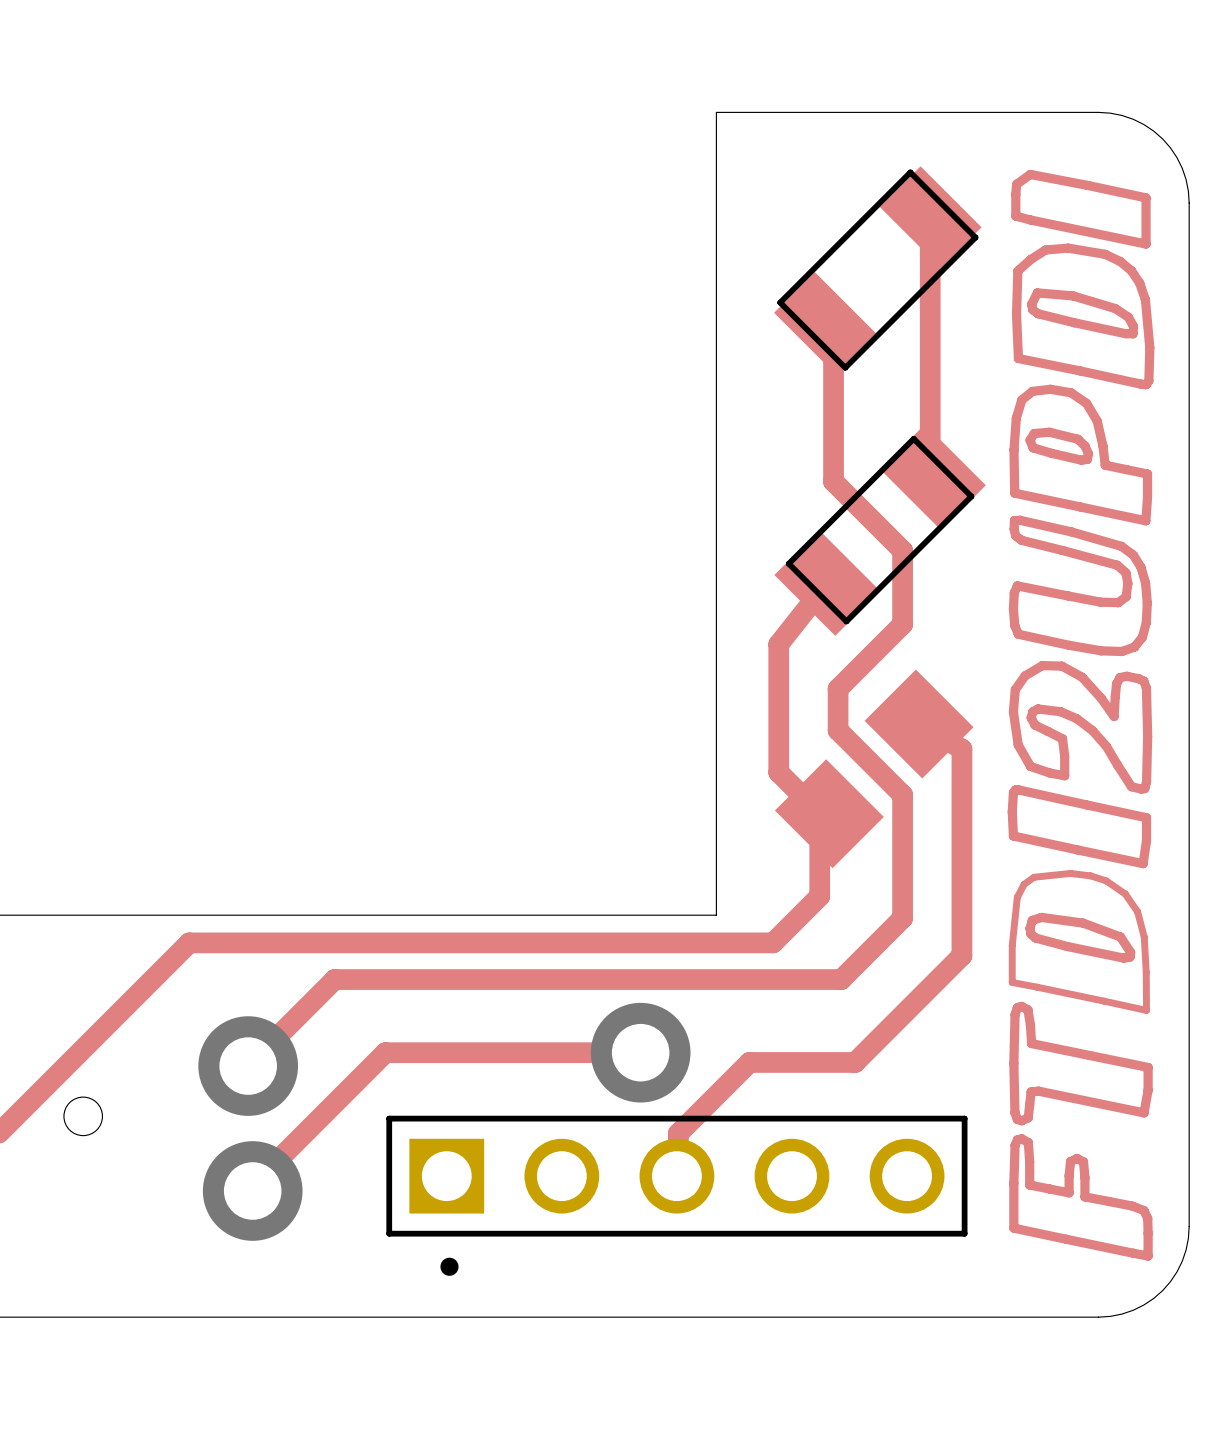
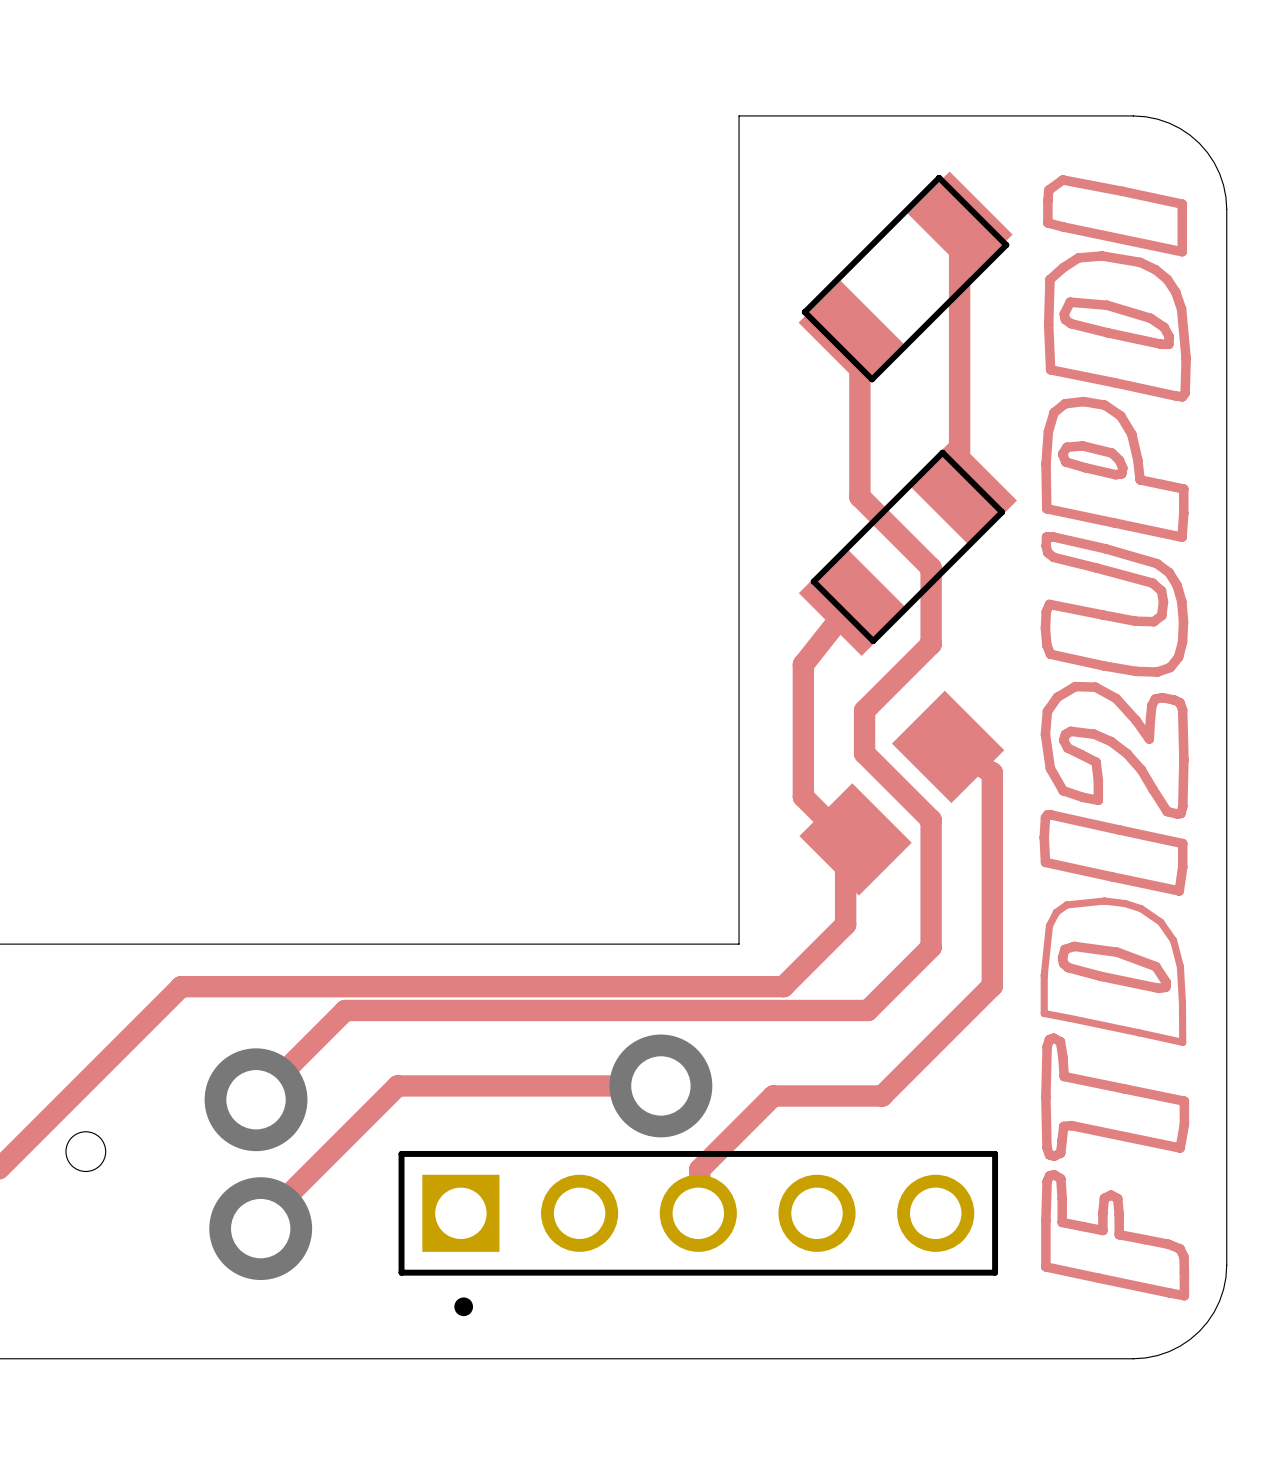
track: (773, 942) (189, 942) (175, 956) -> (797, 972) (783, 986) (181, 986)

